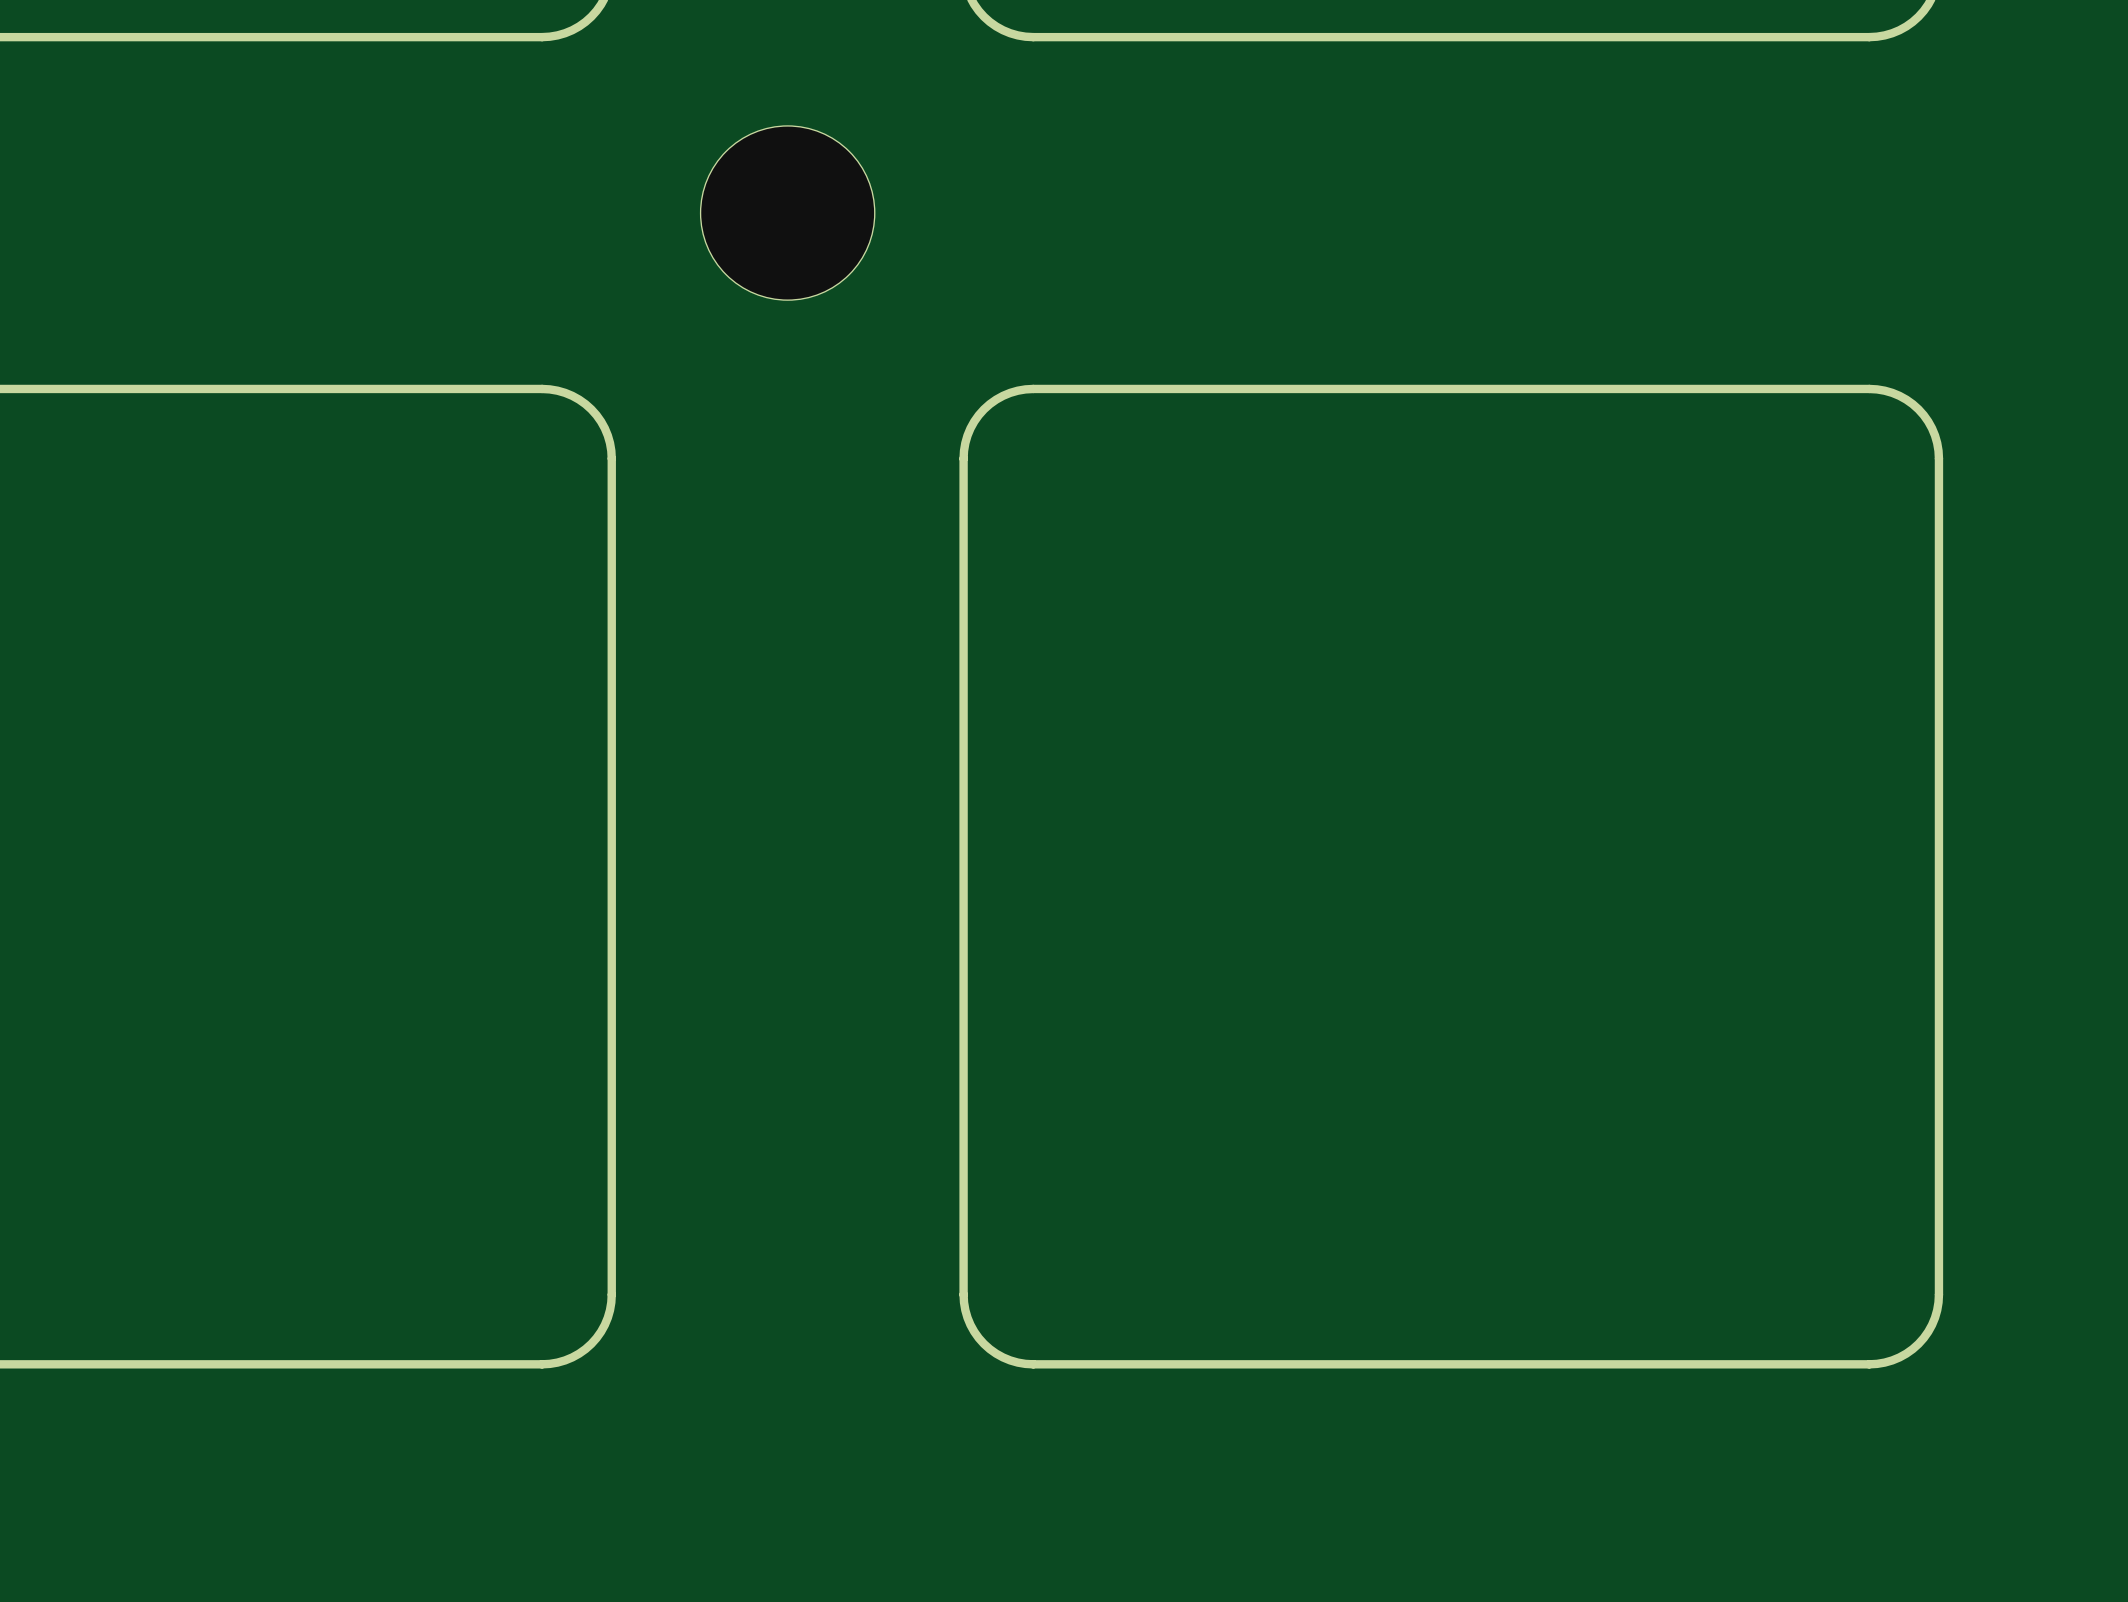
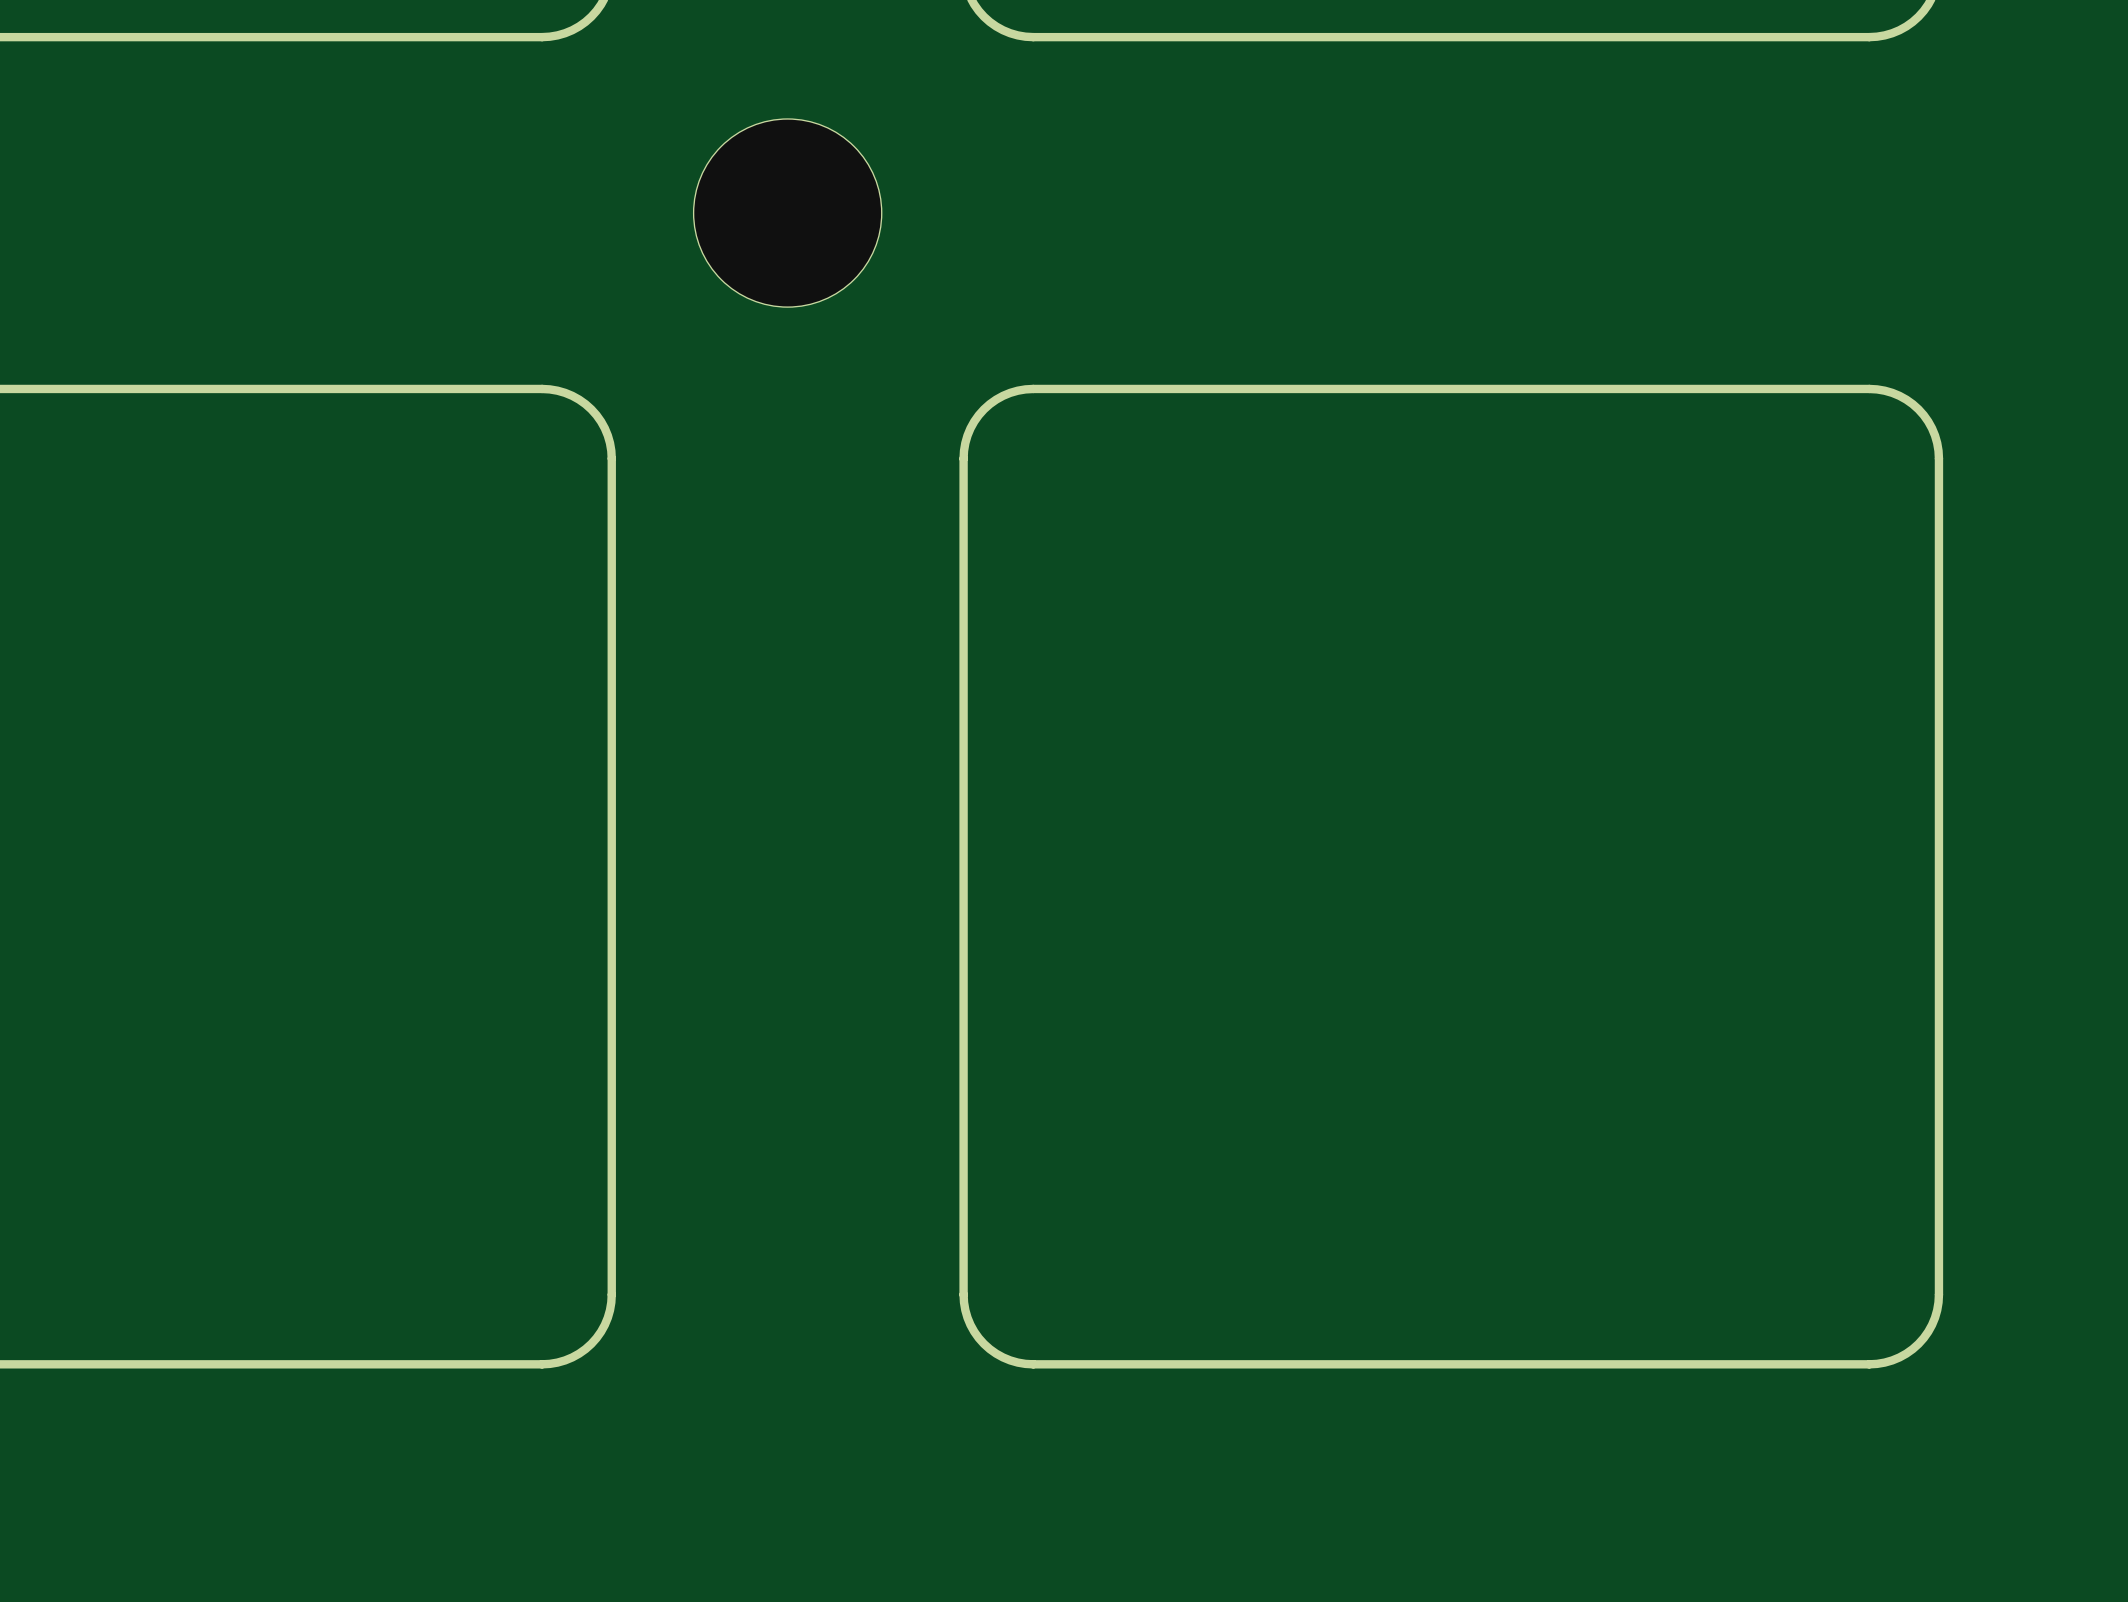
part footprint: [700, 125, 875, 301] -> [693, 118, 882, 308]

